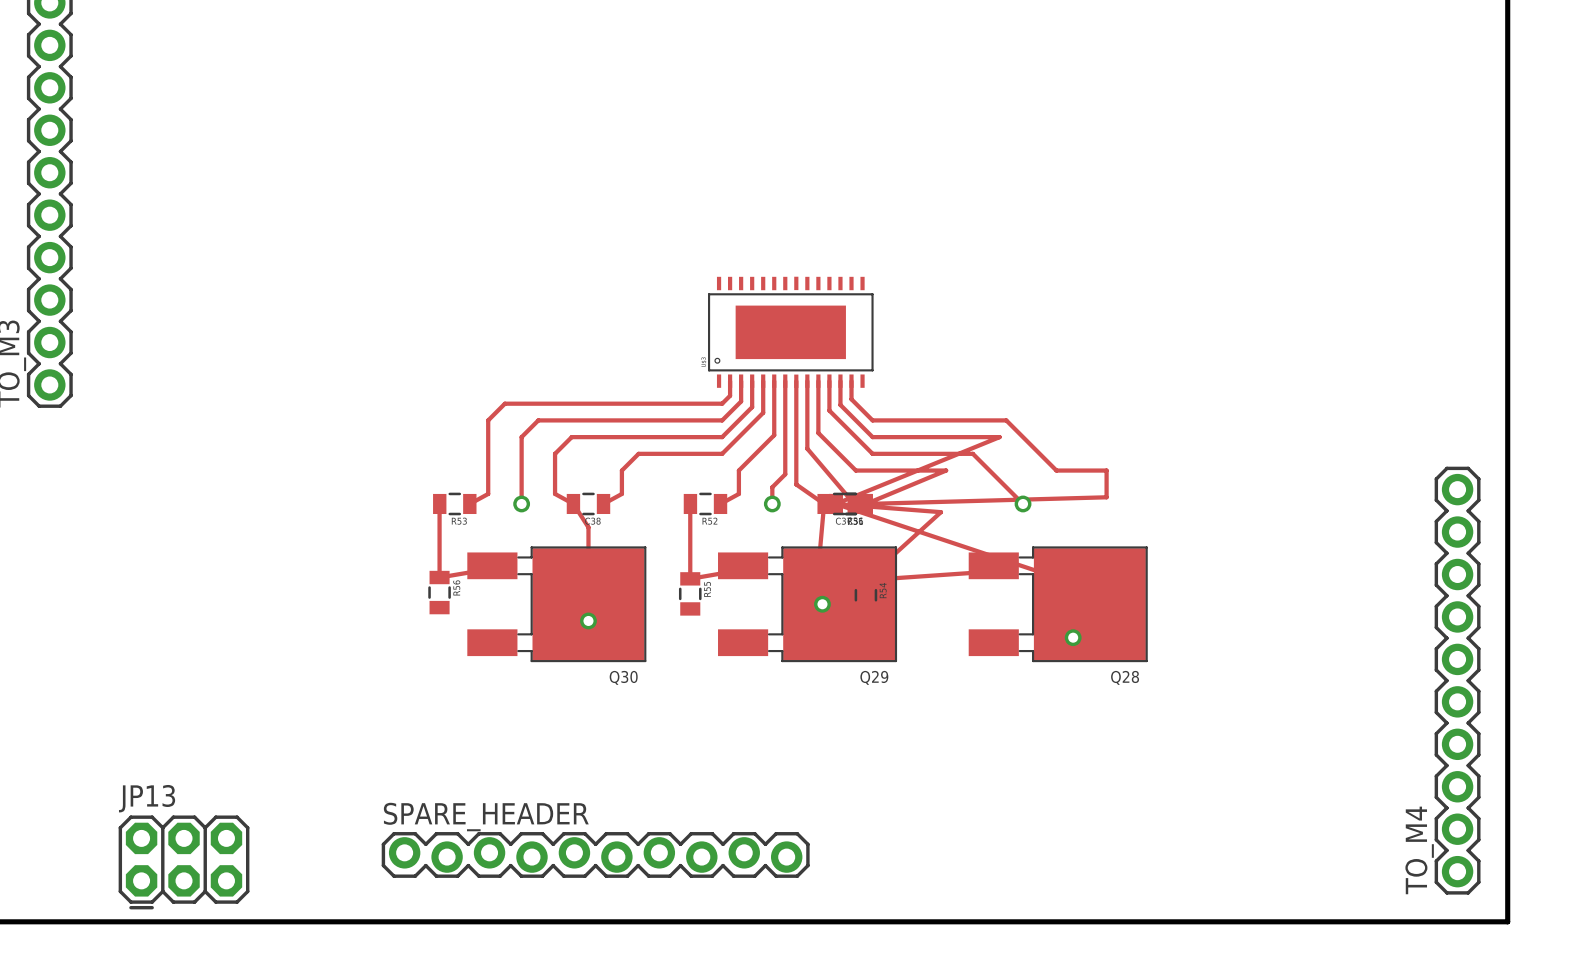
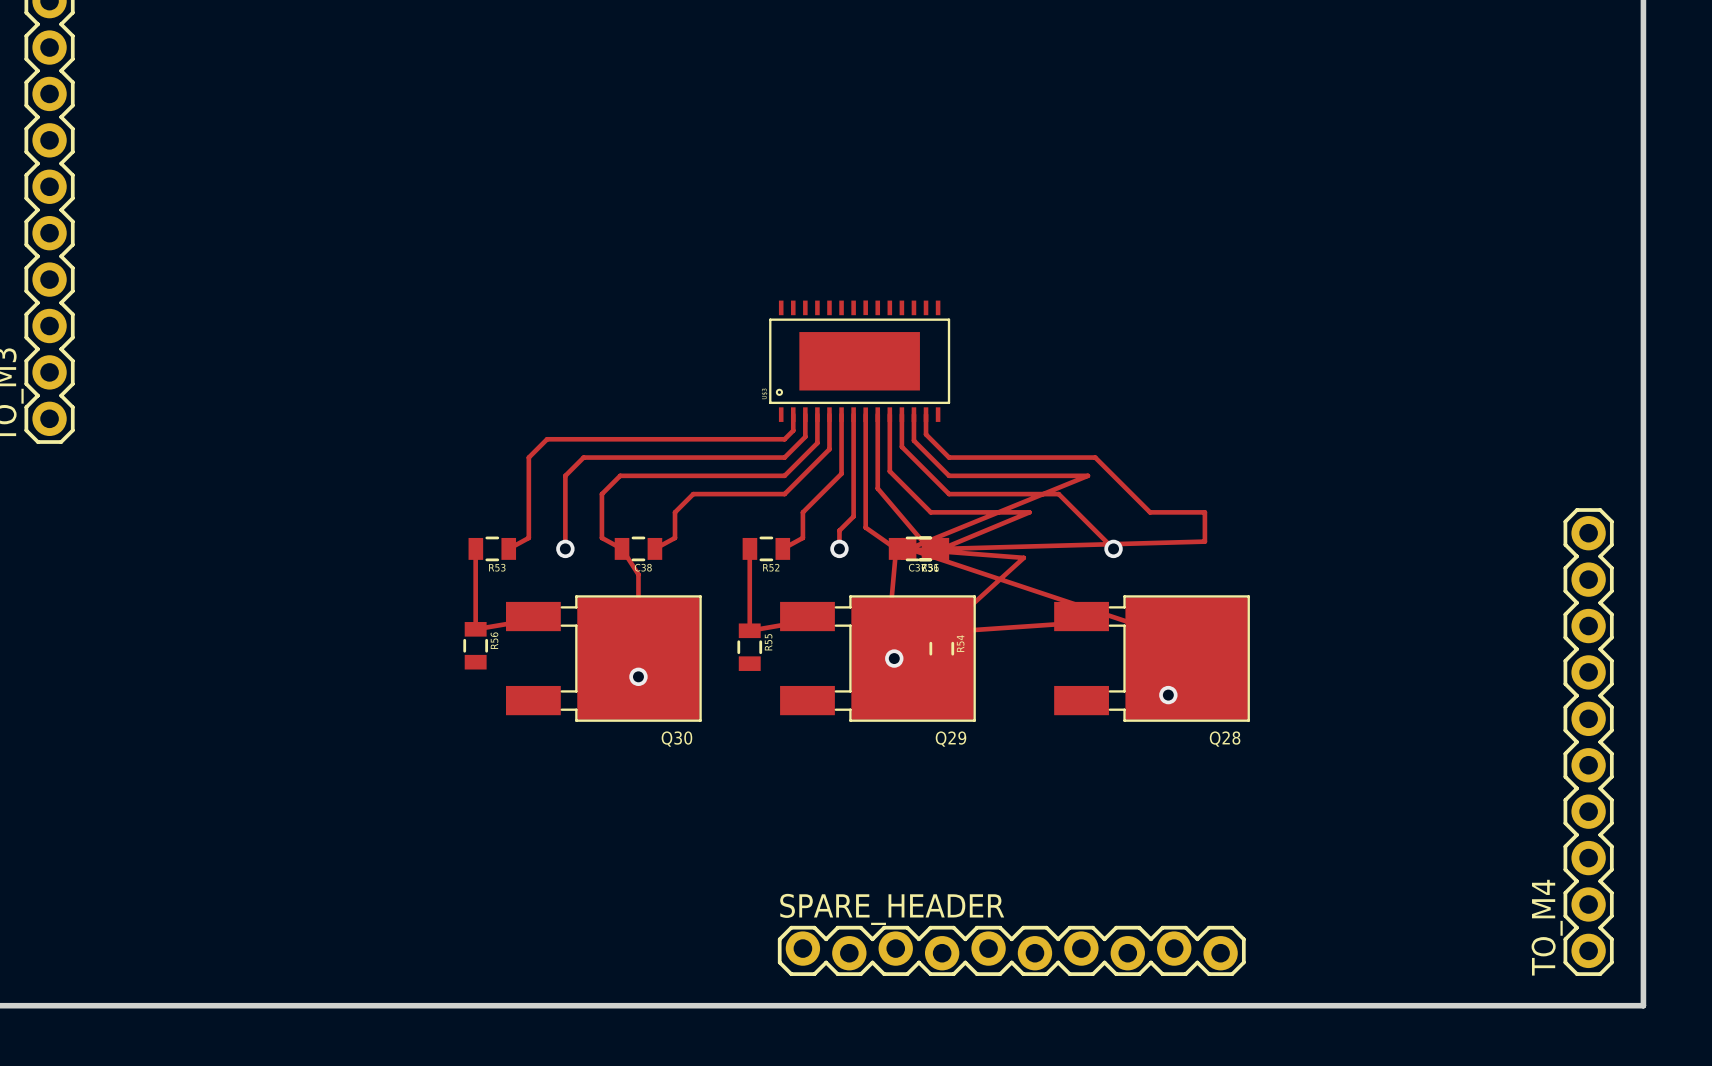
SPARE_HEADER position: (595, 854) -> (1011, 950)
JP13: (184, 862) -> none

